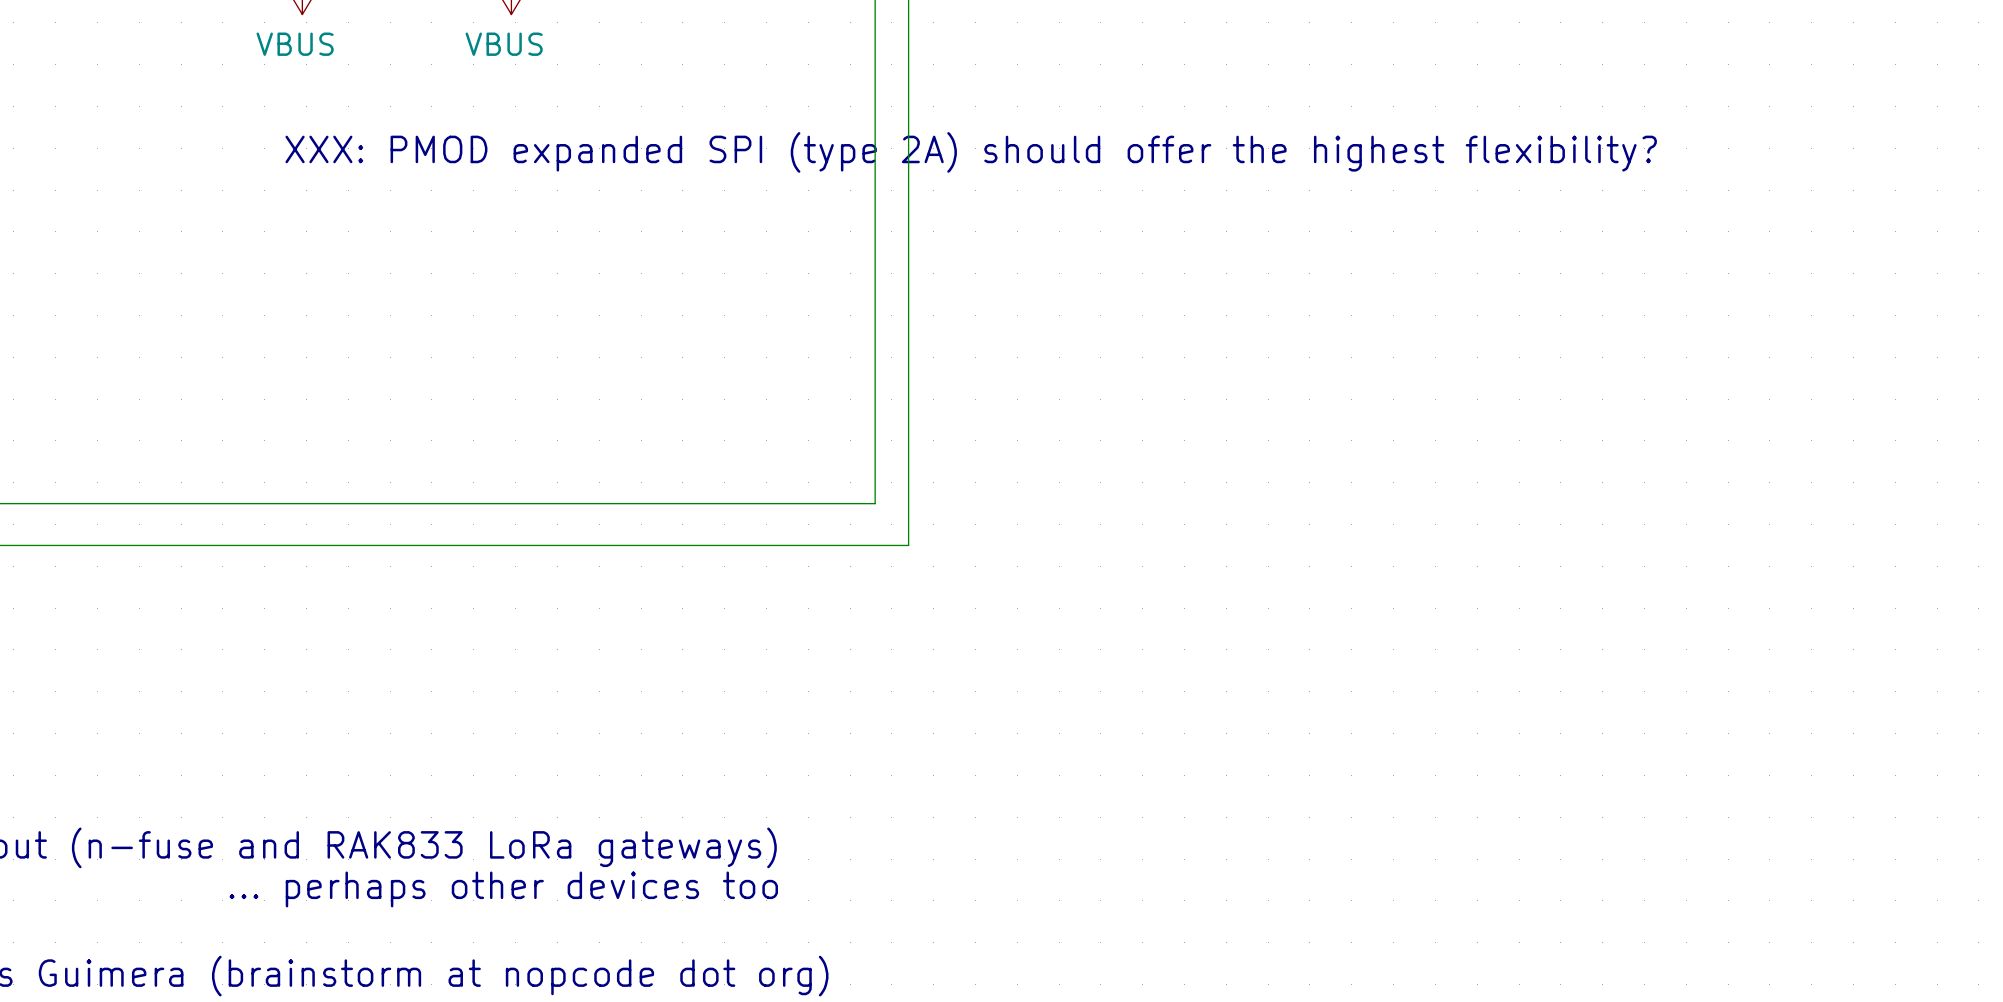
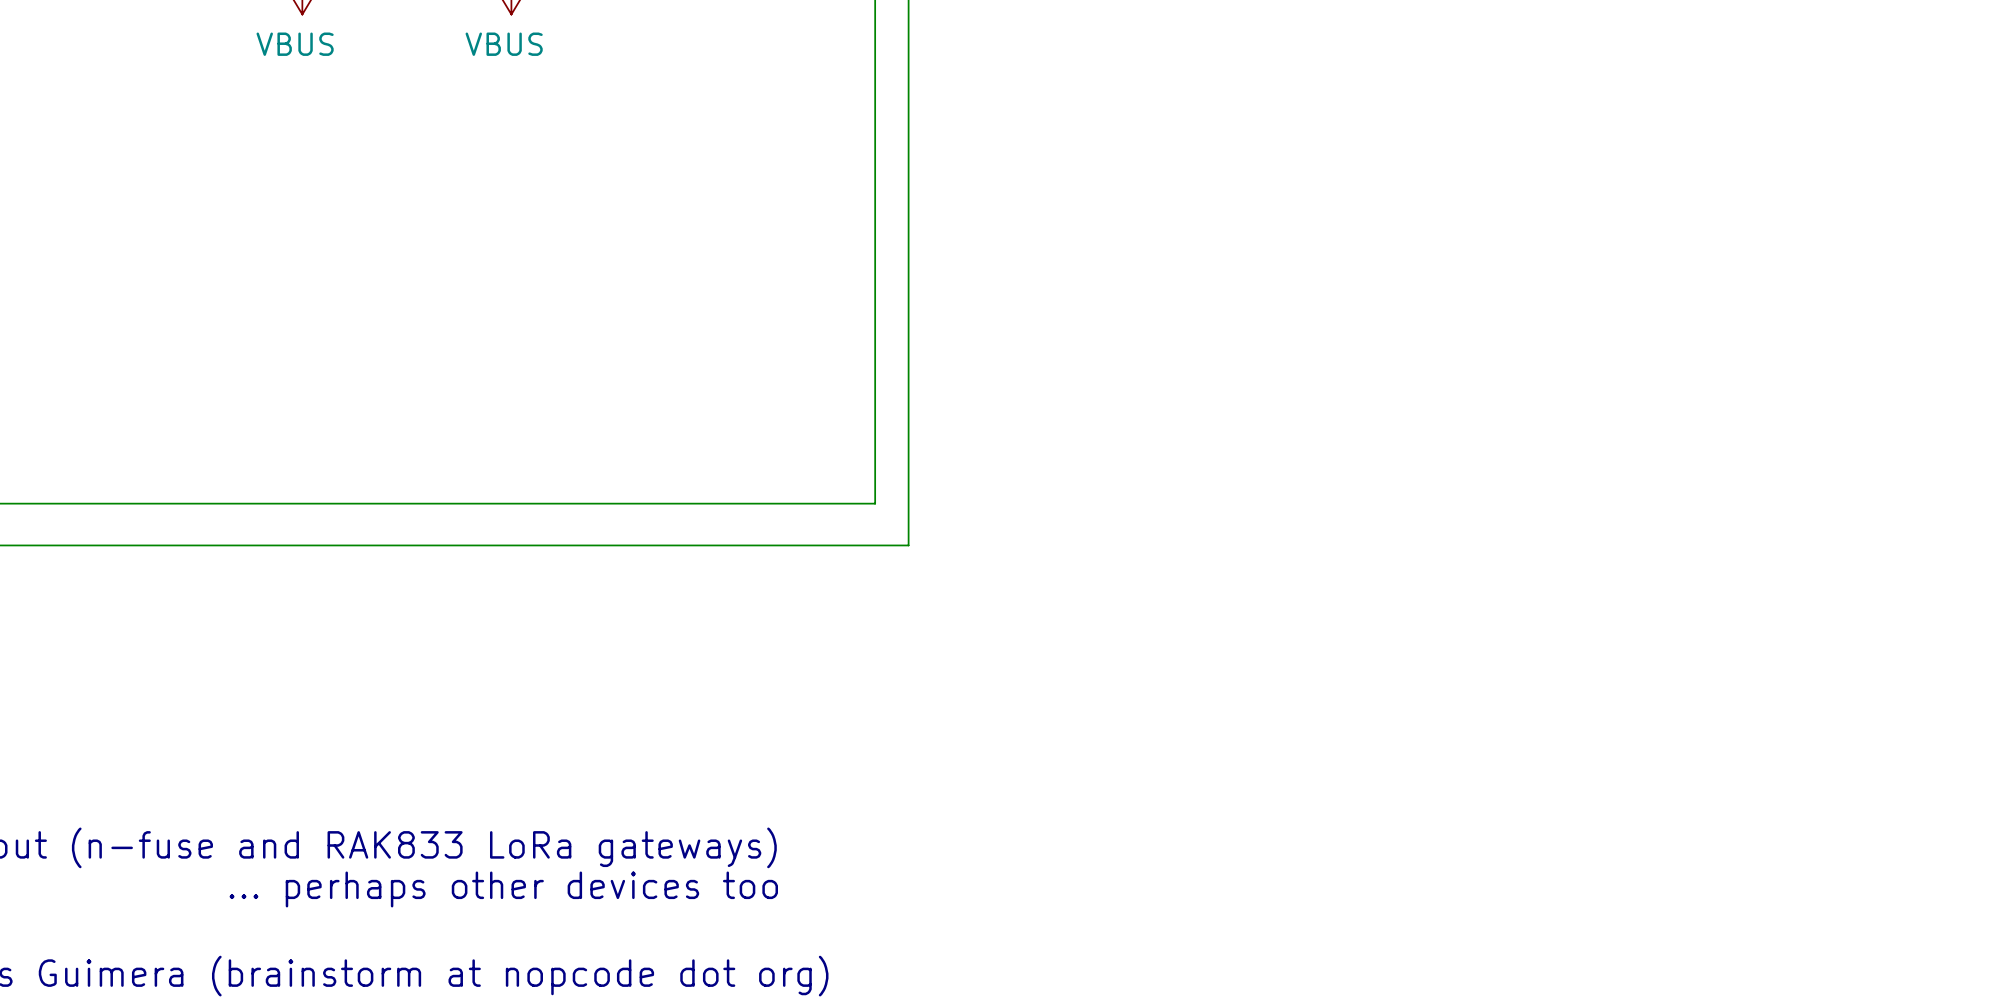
text: XXX: PMOD expanded SPI (type 2A) should offer the highest flexibility? (971, 152) -> none

